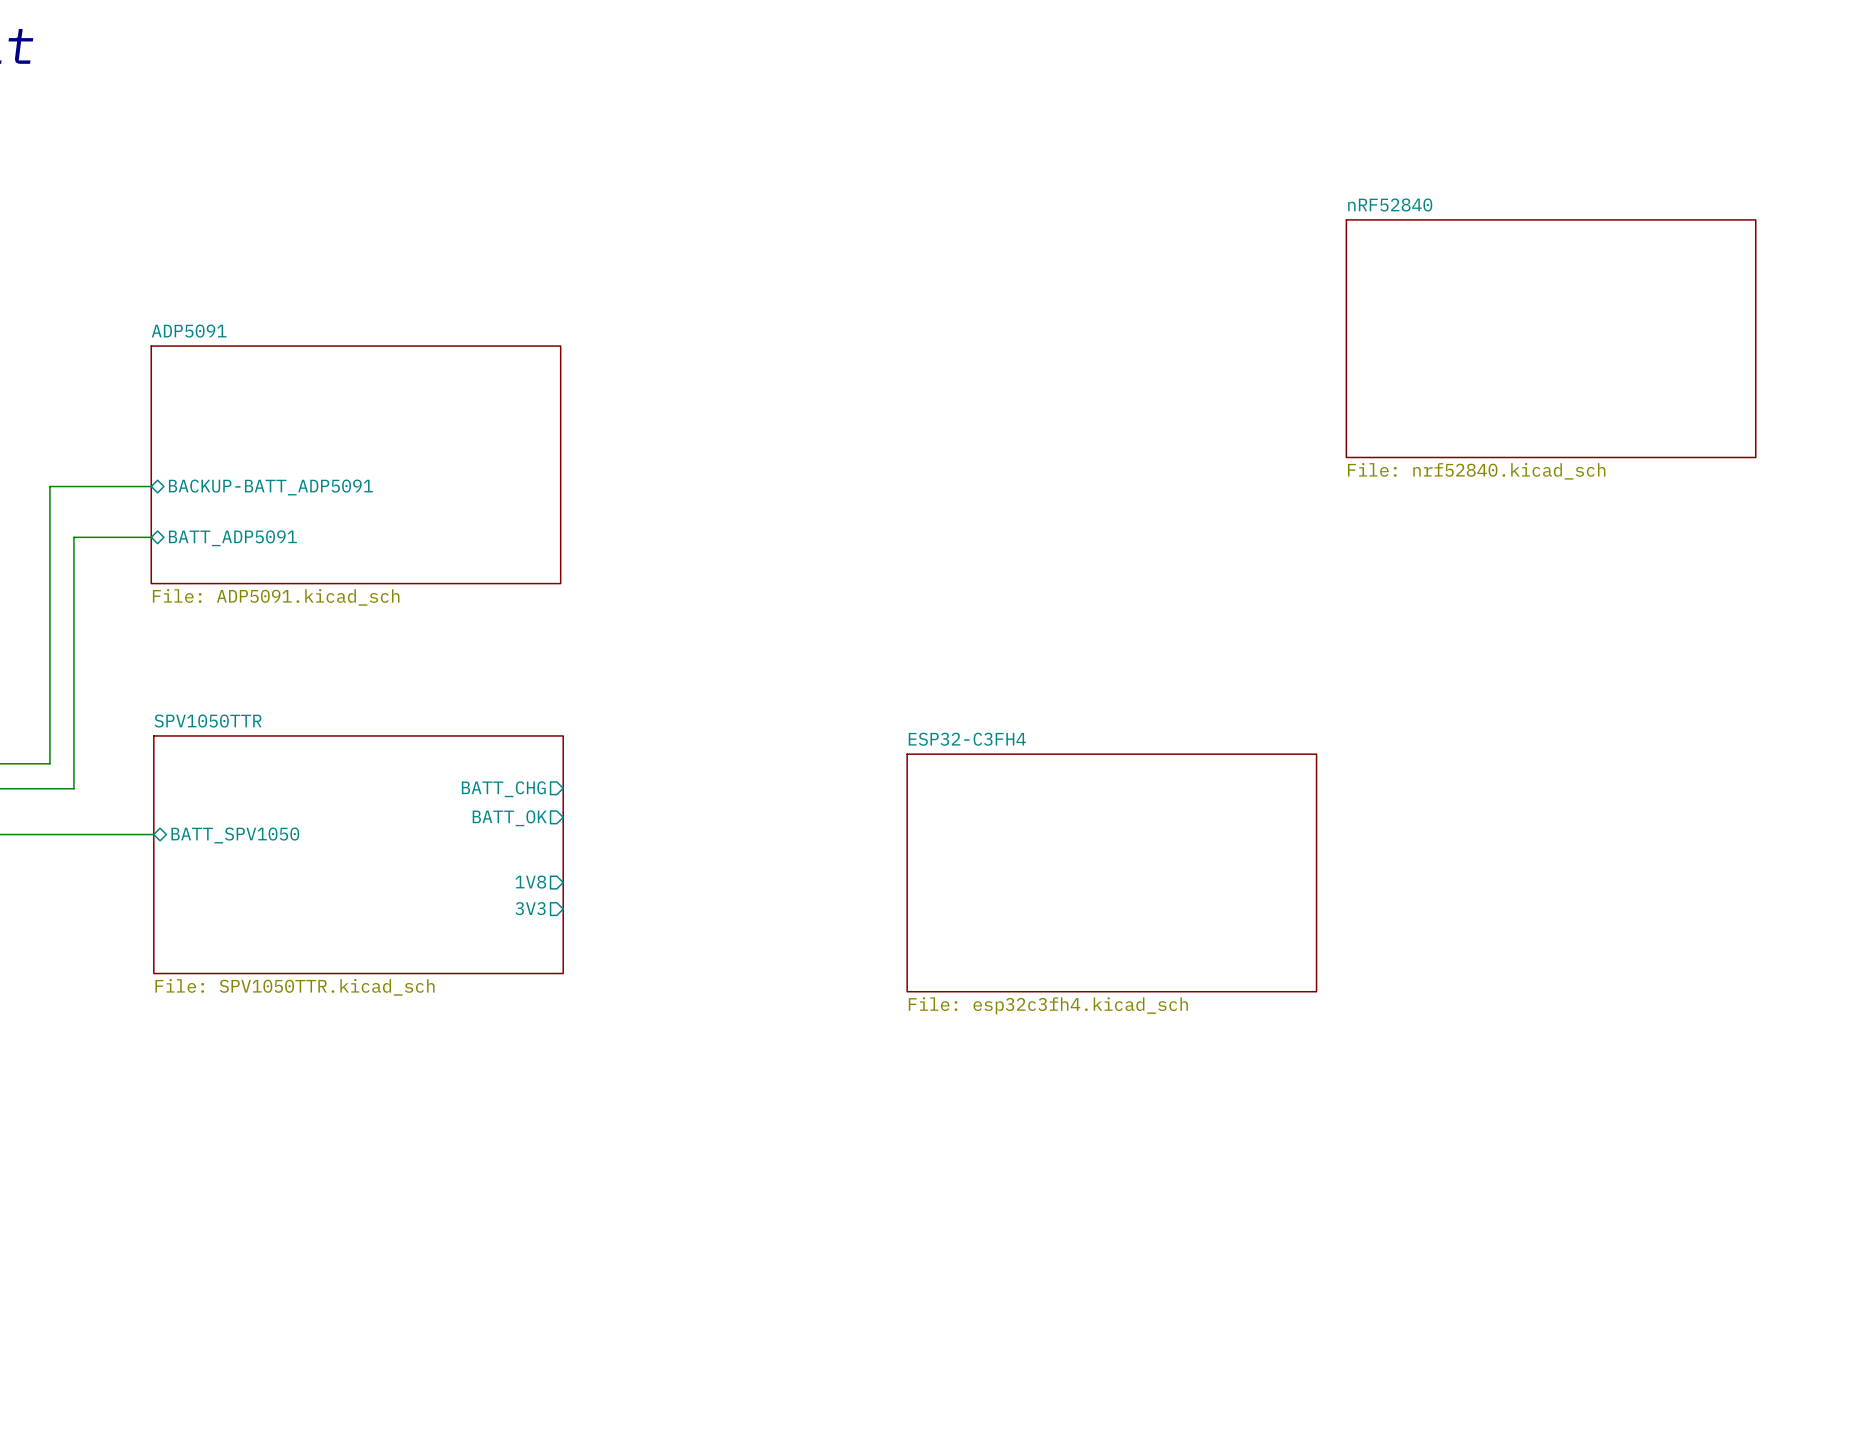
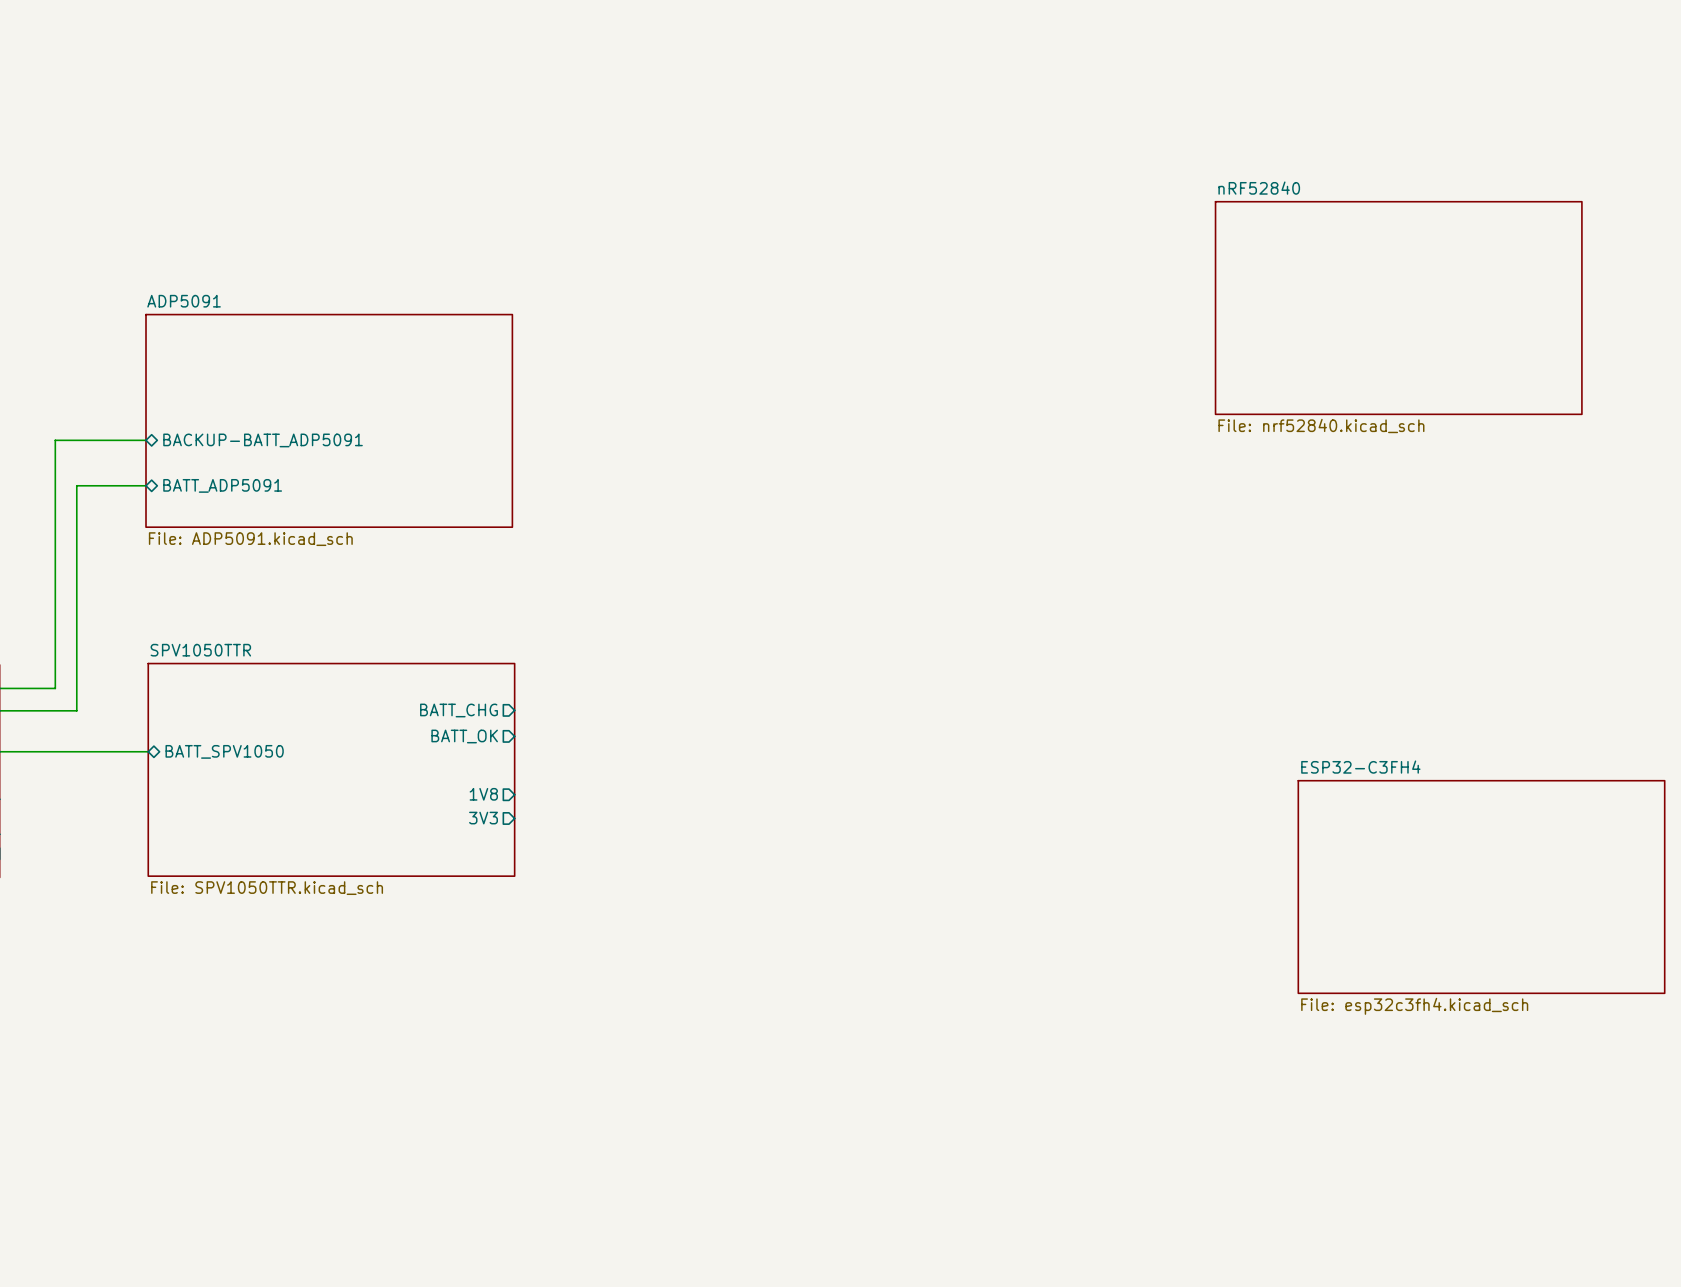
sheet ESP32-C3FH4 position: (1111, 872) -> (1481, 887)

